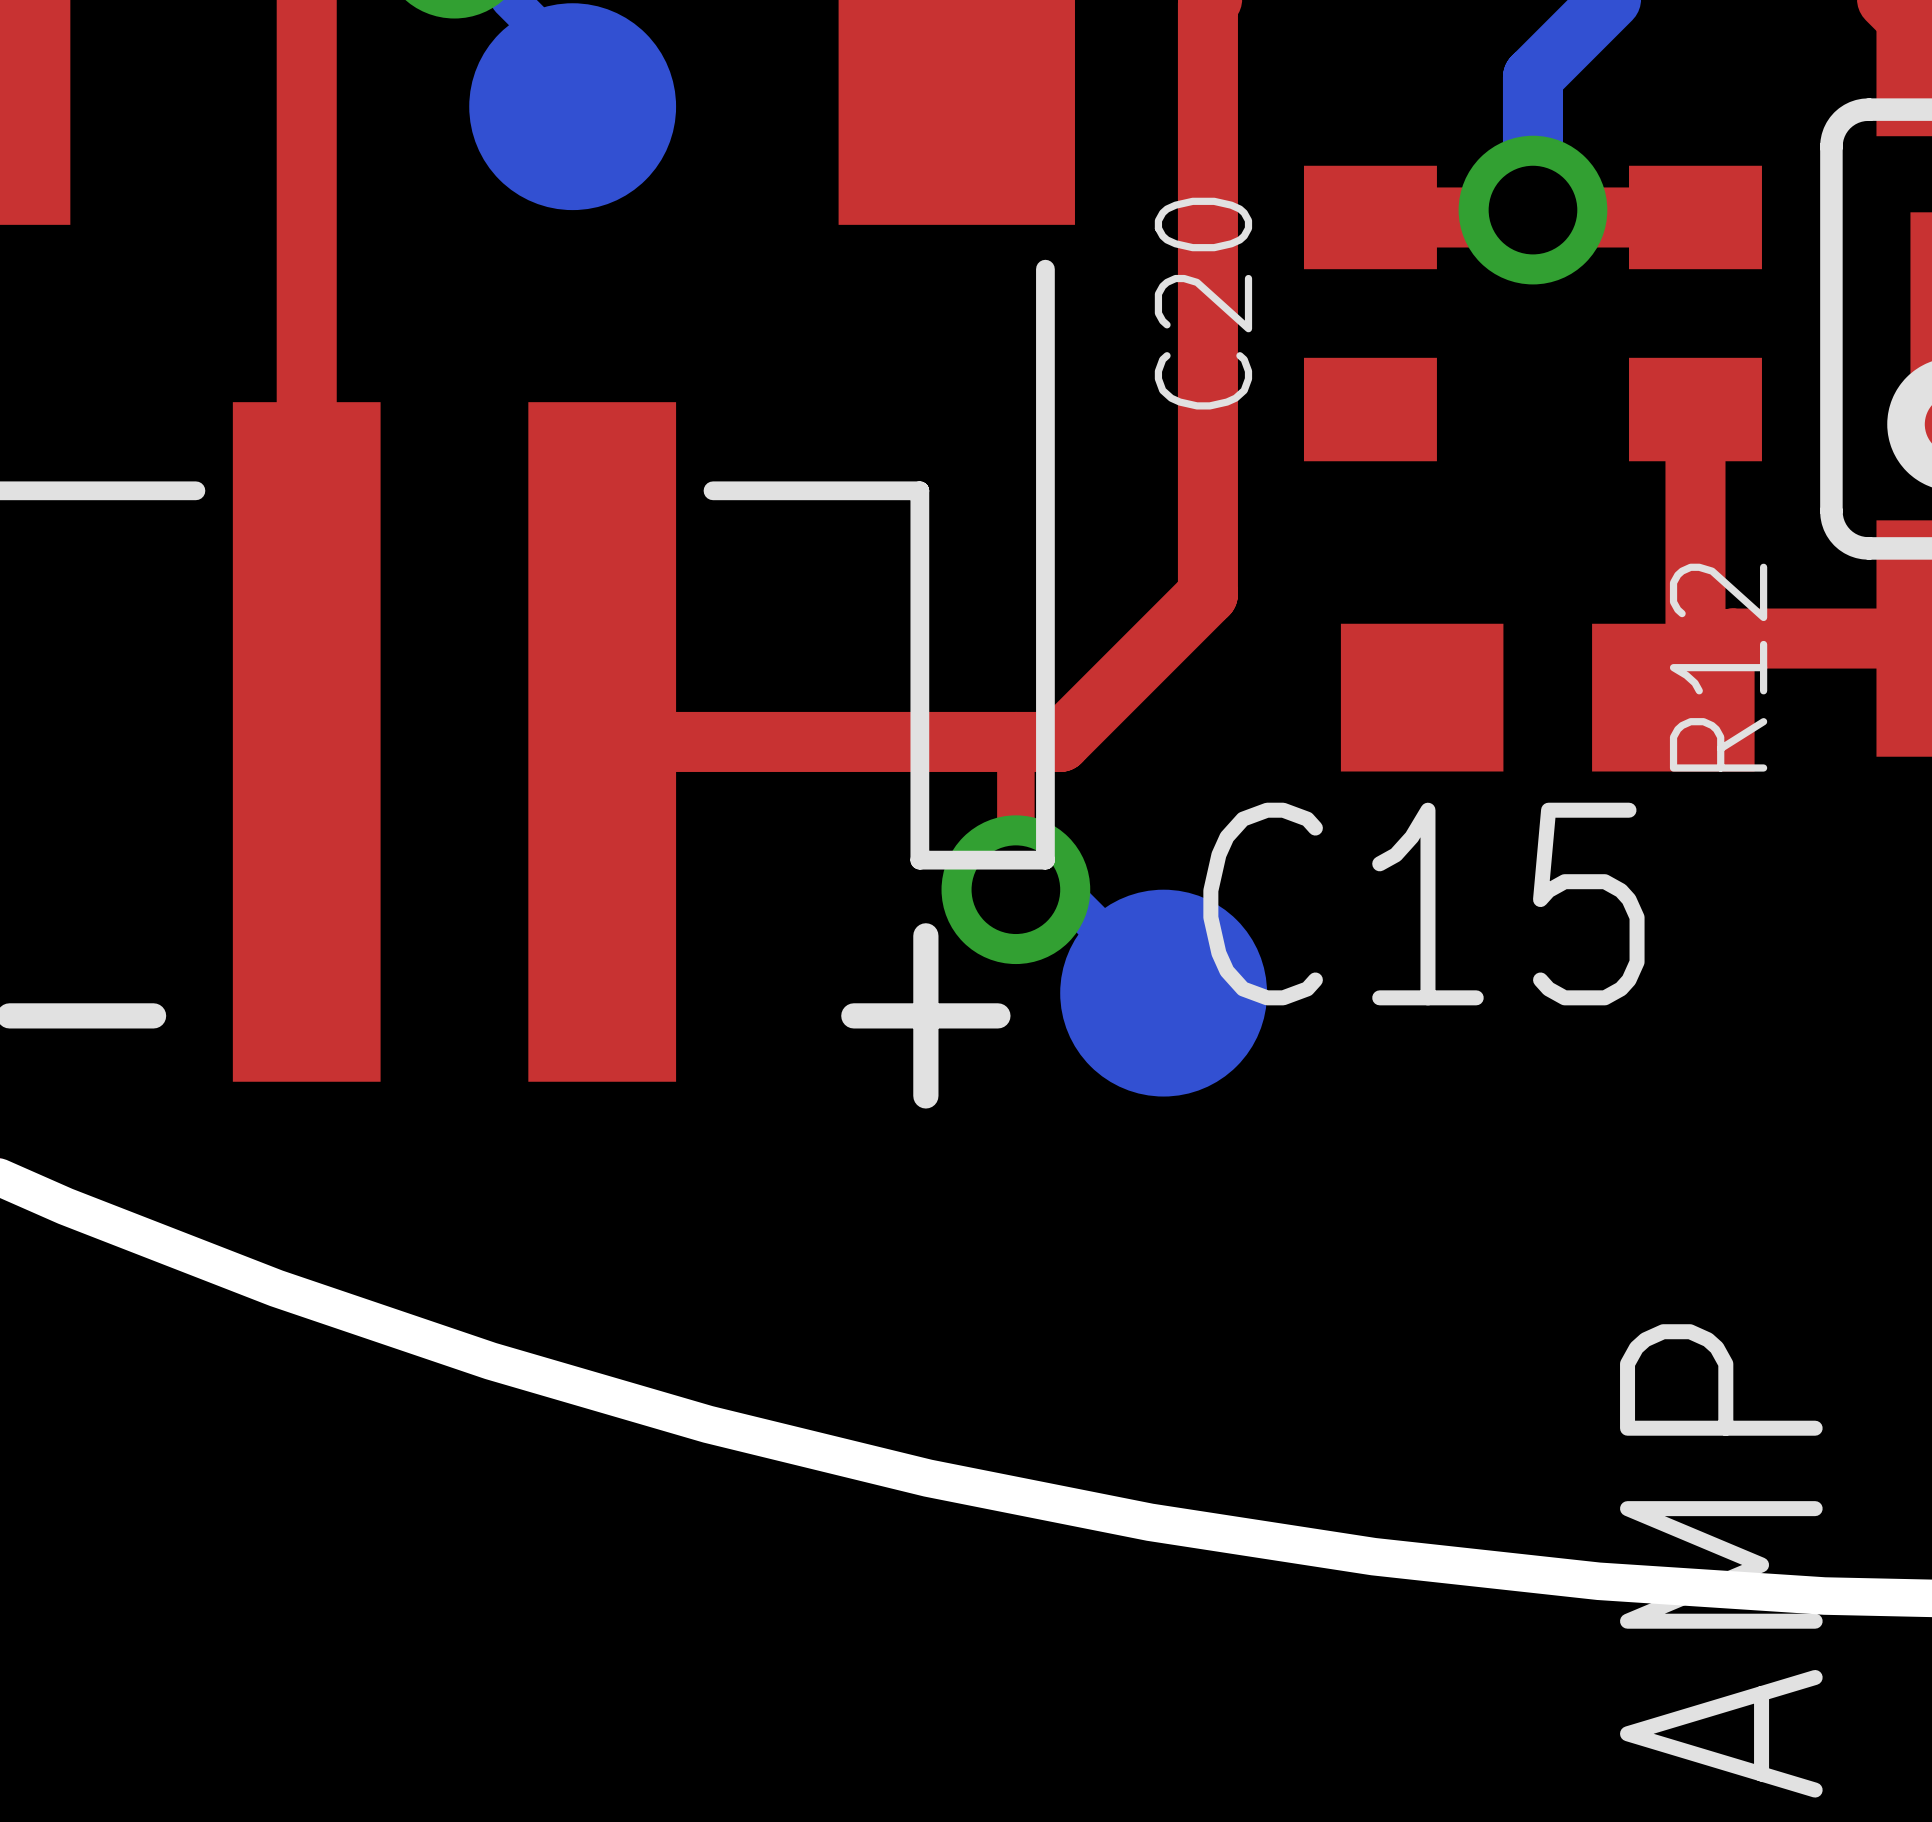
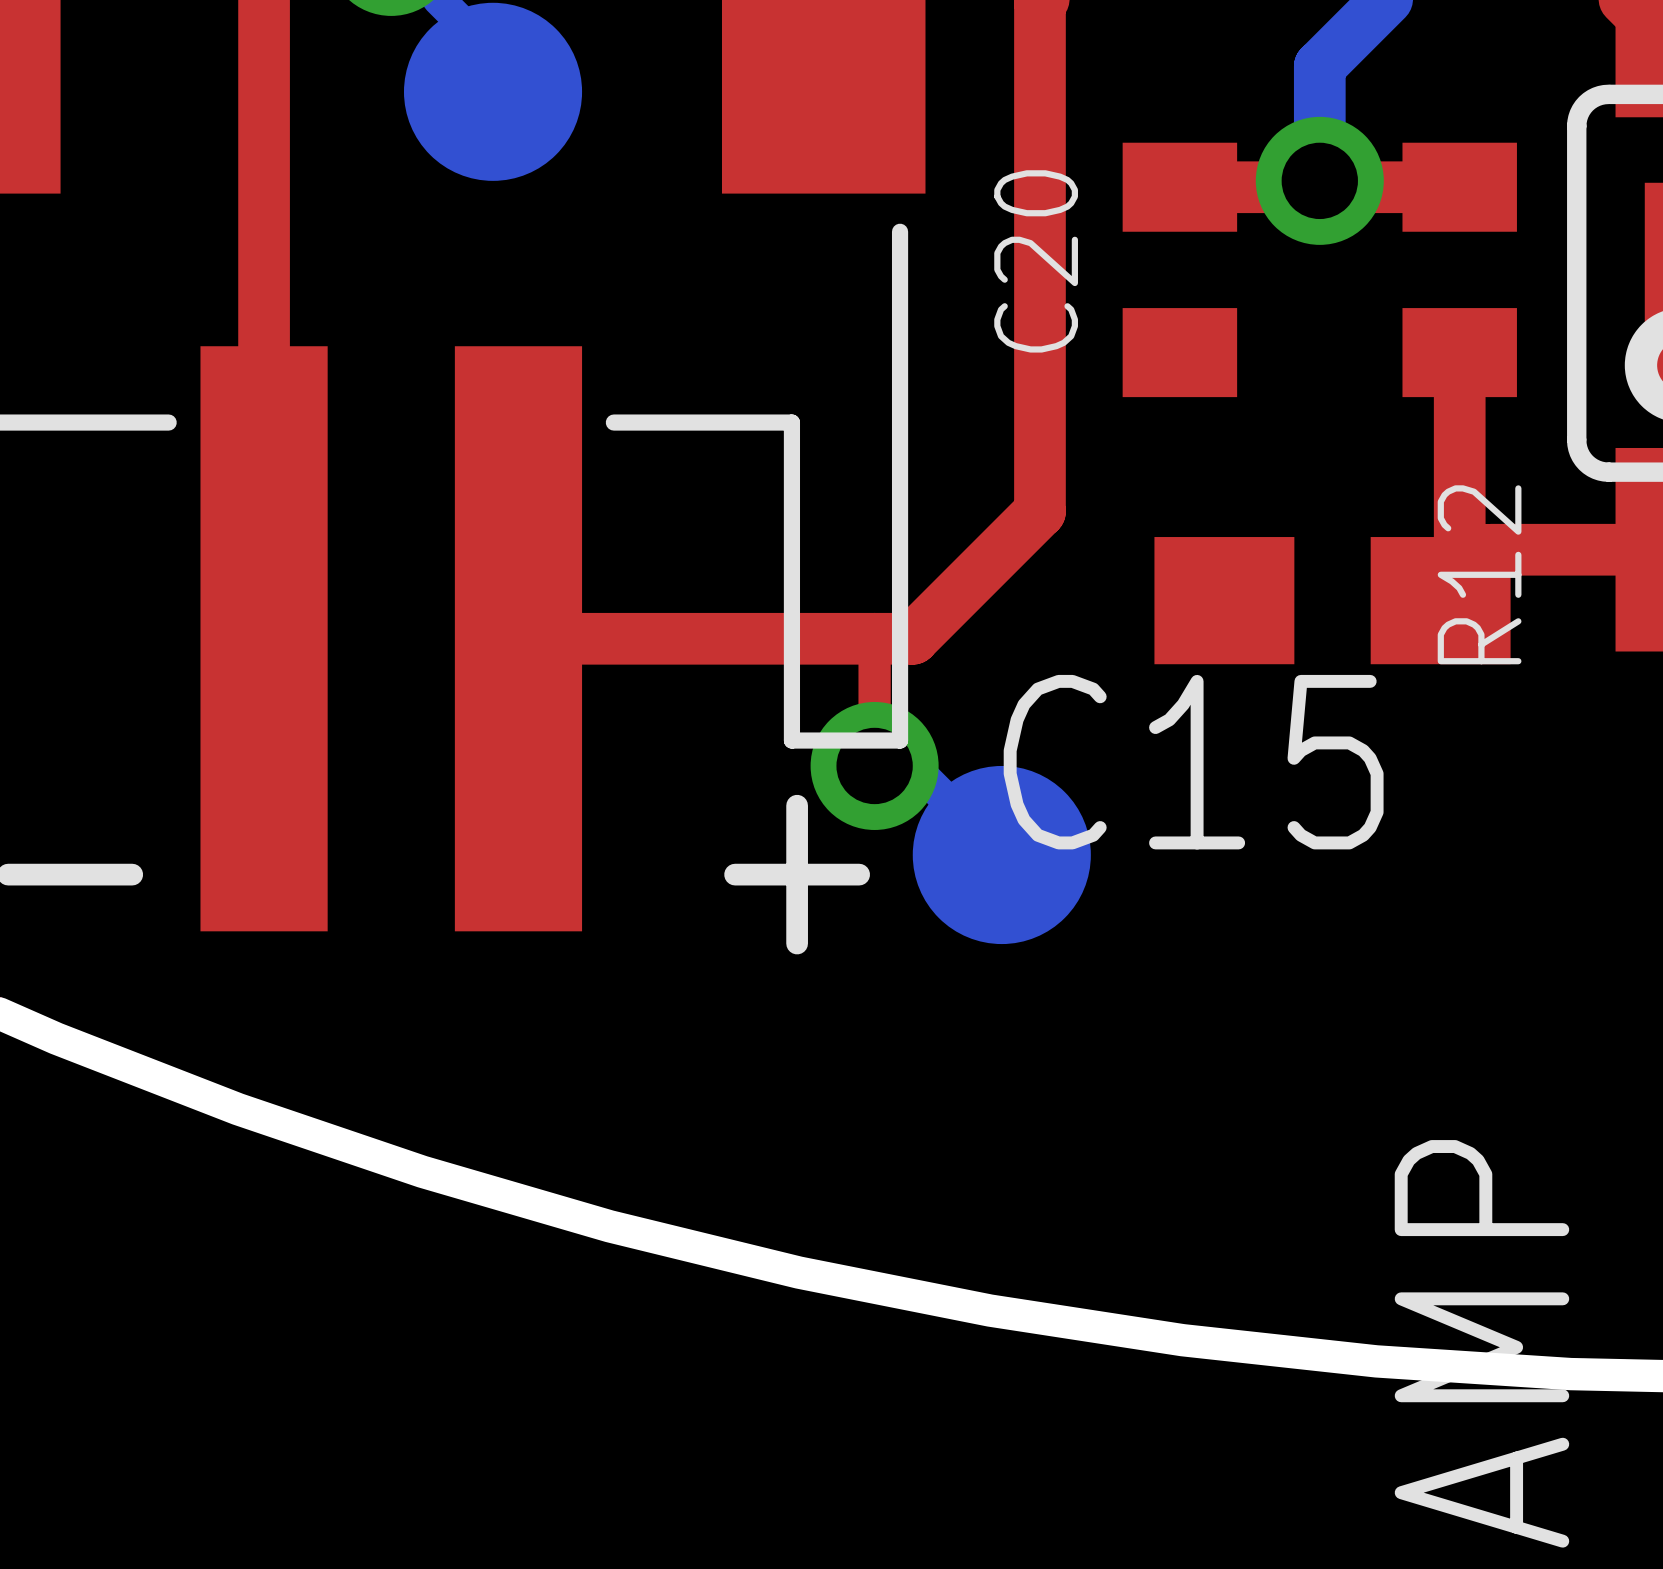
C15 name position: C15 (1423, 904) -> C15 (1193, 762)

